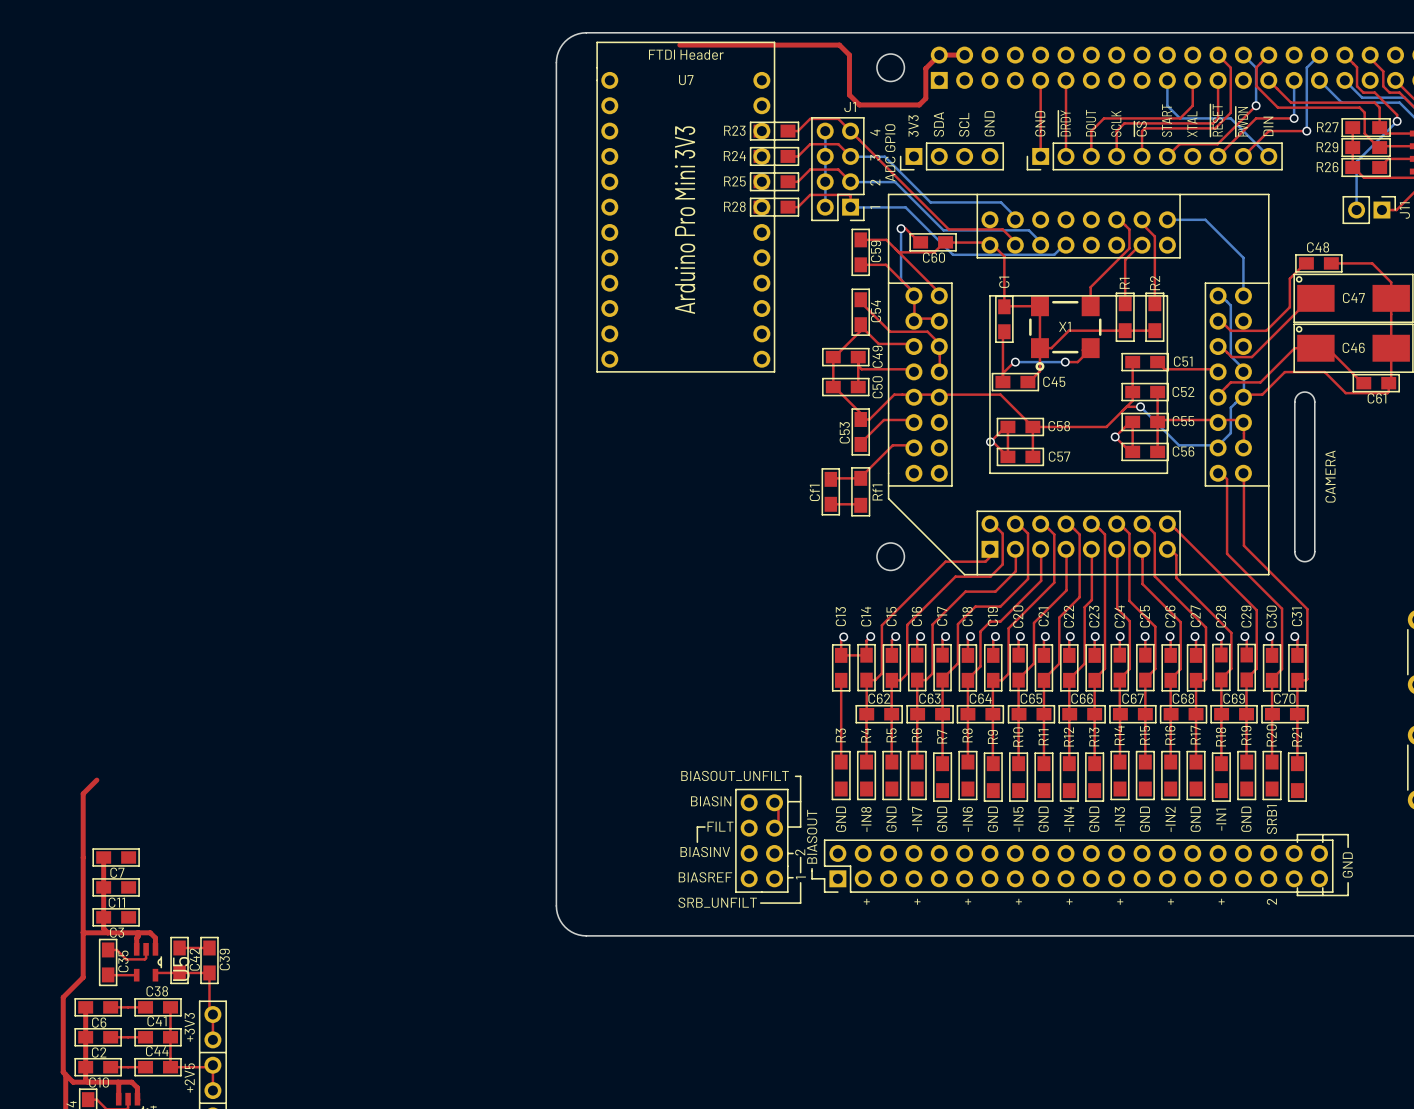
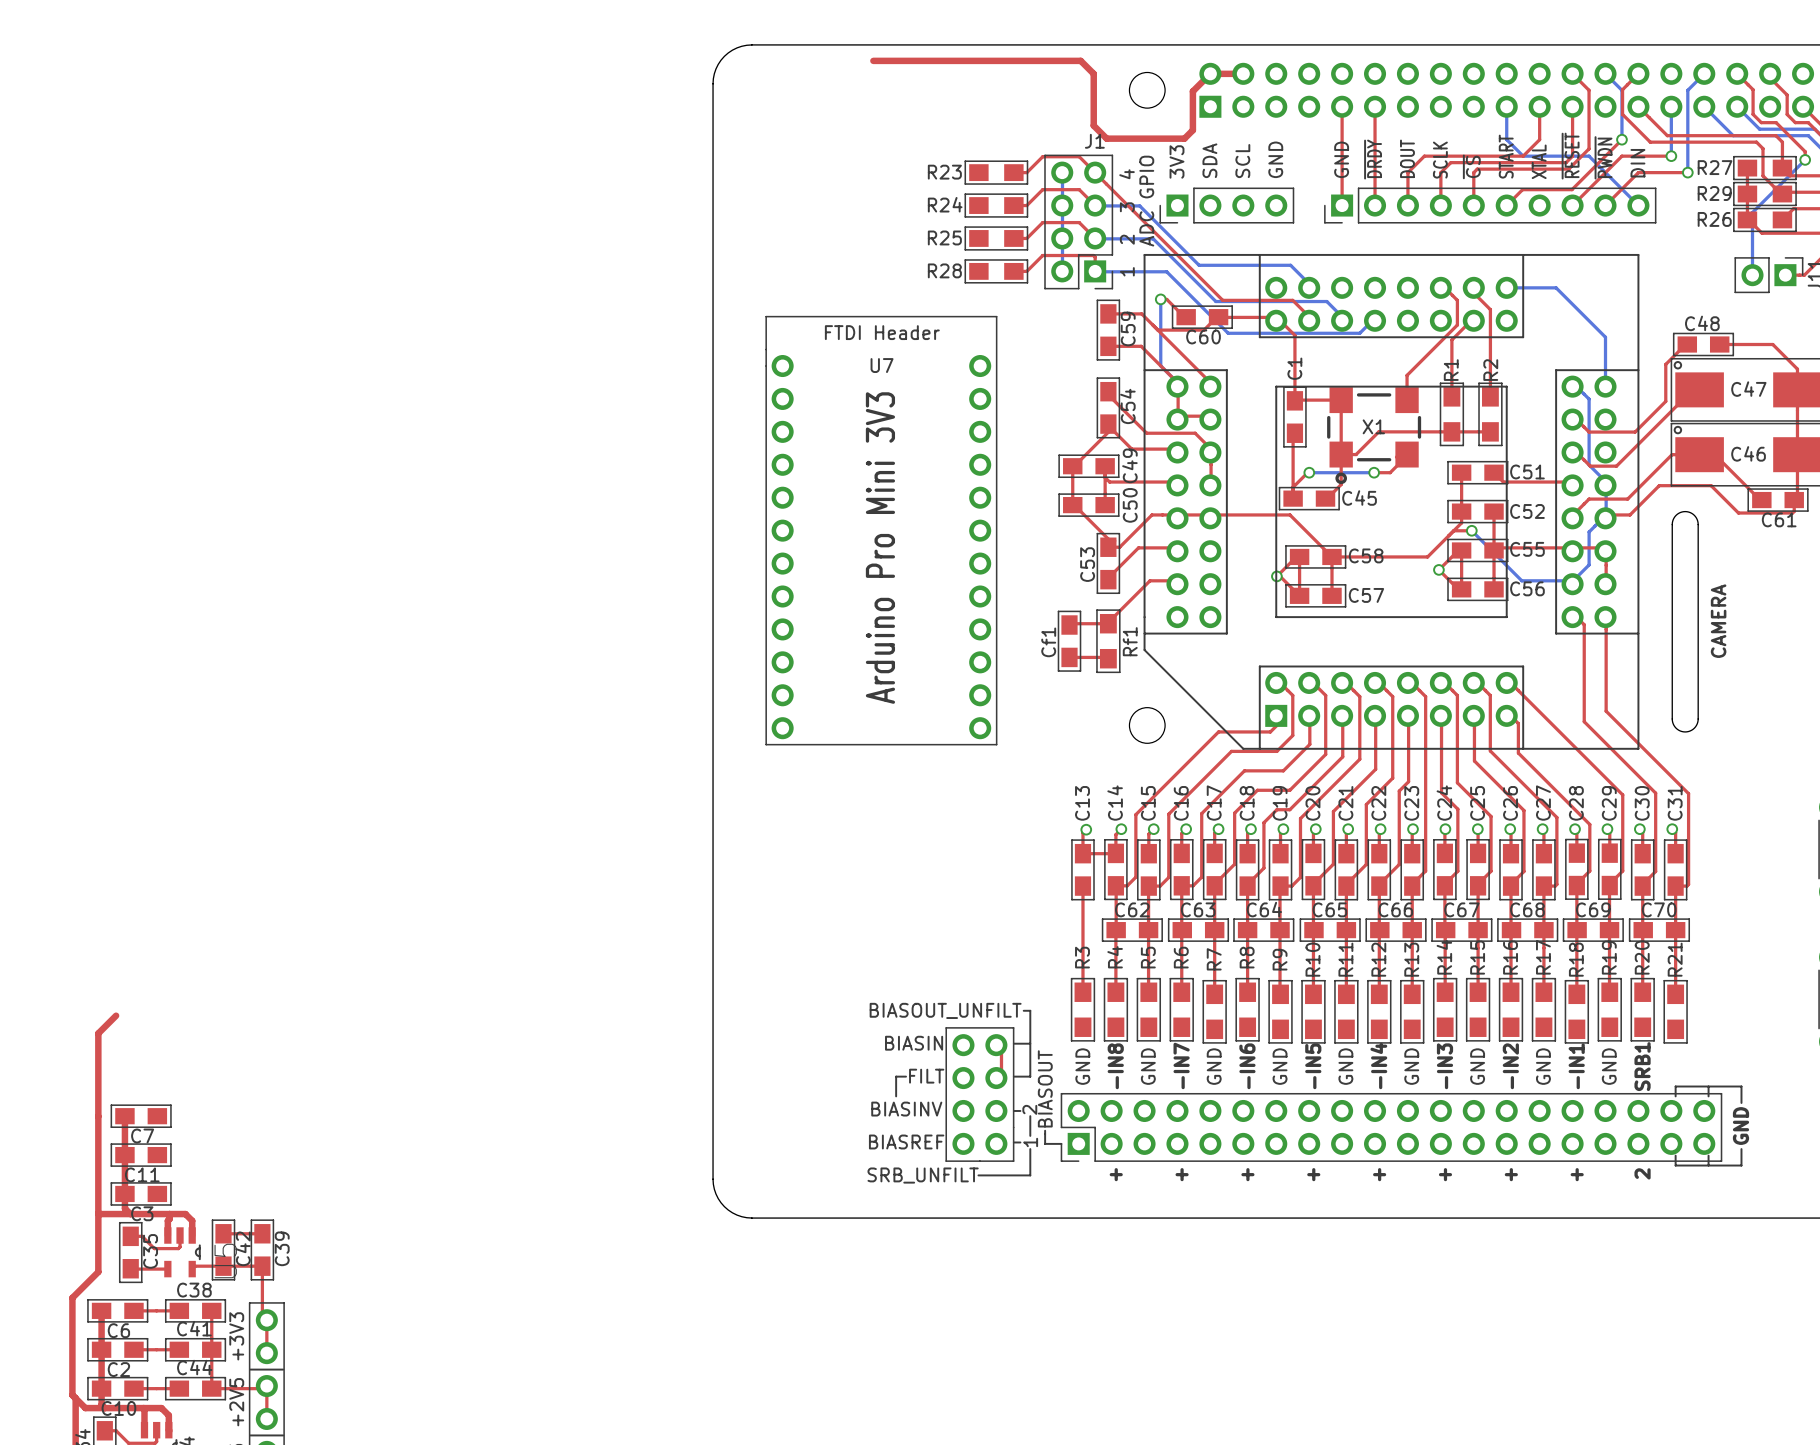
U7 position: (685, 207) -> (881, 530)

